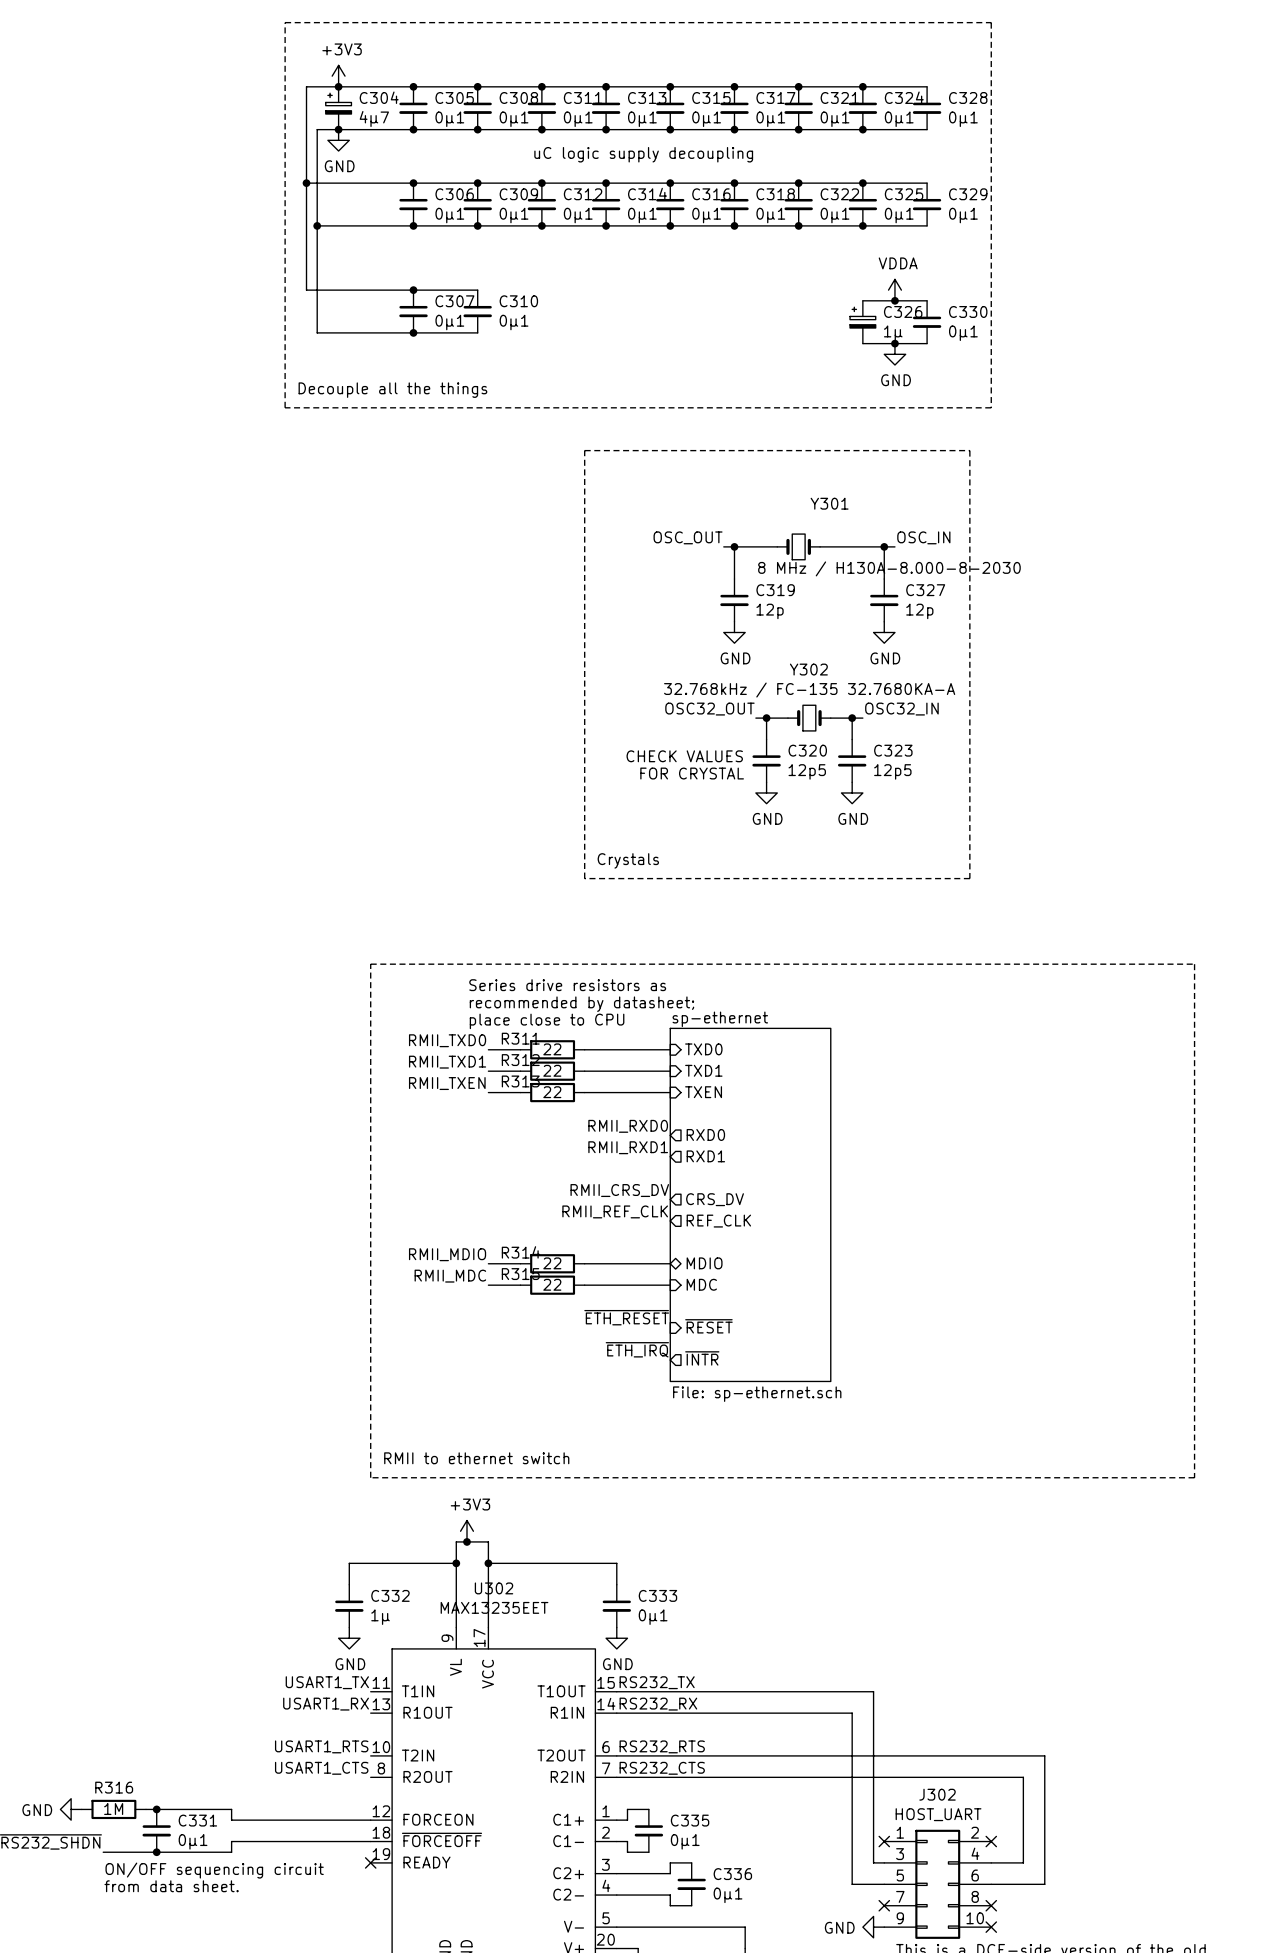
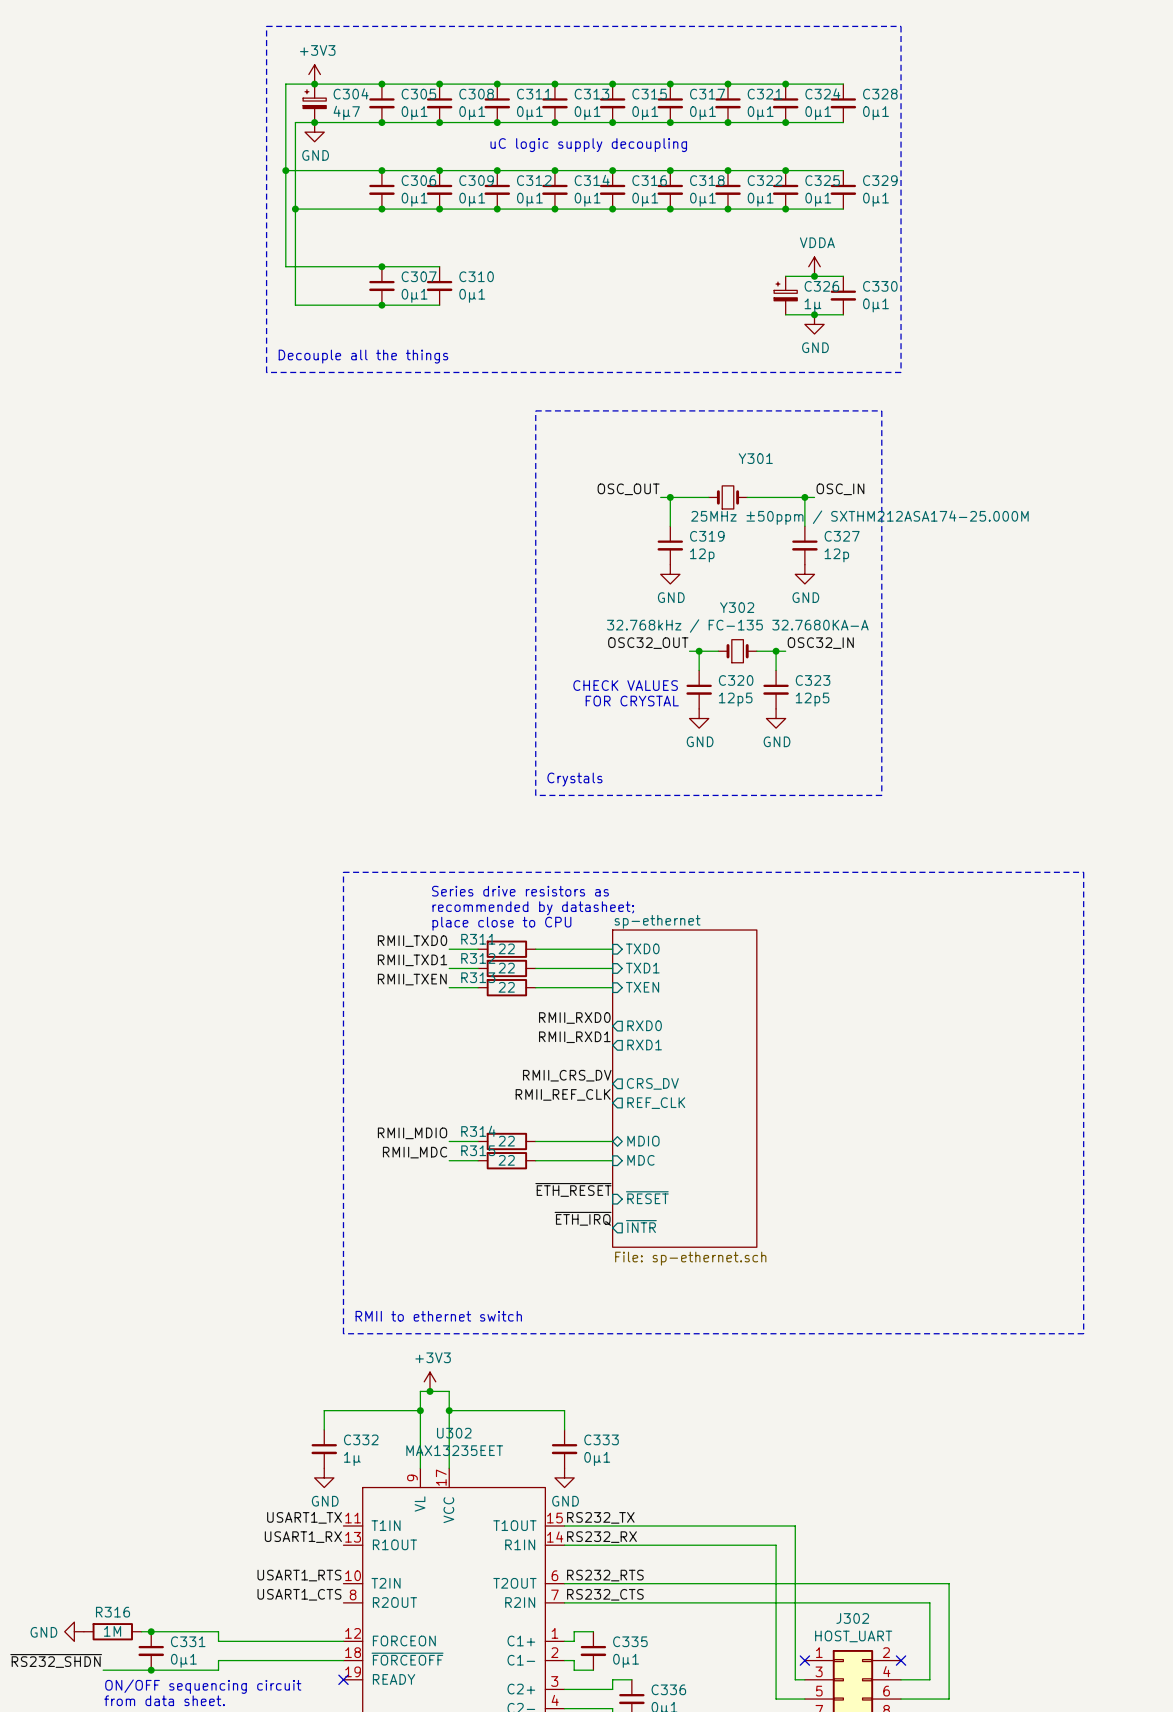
Y301 value: 8 MHz / H130A-8.000-8-2030 (889, 568) -> 25MHz ±50ppm / SXTHM212ASA174-25.000M (859, 517)

